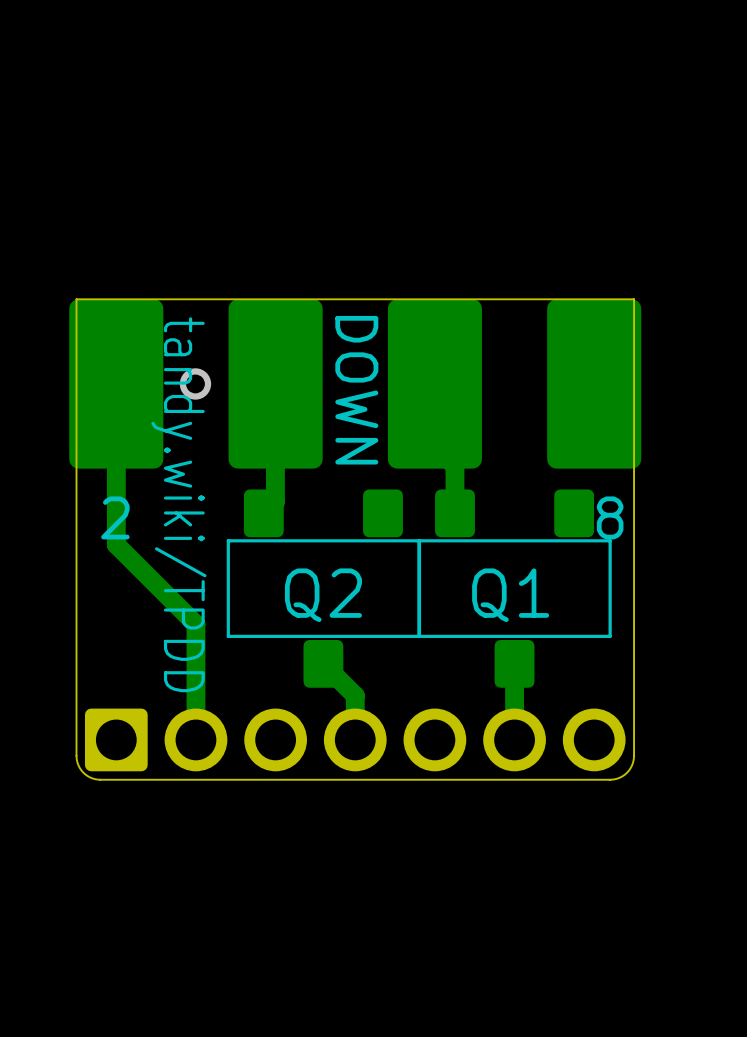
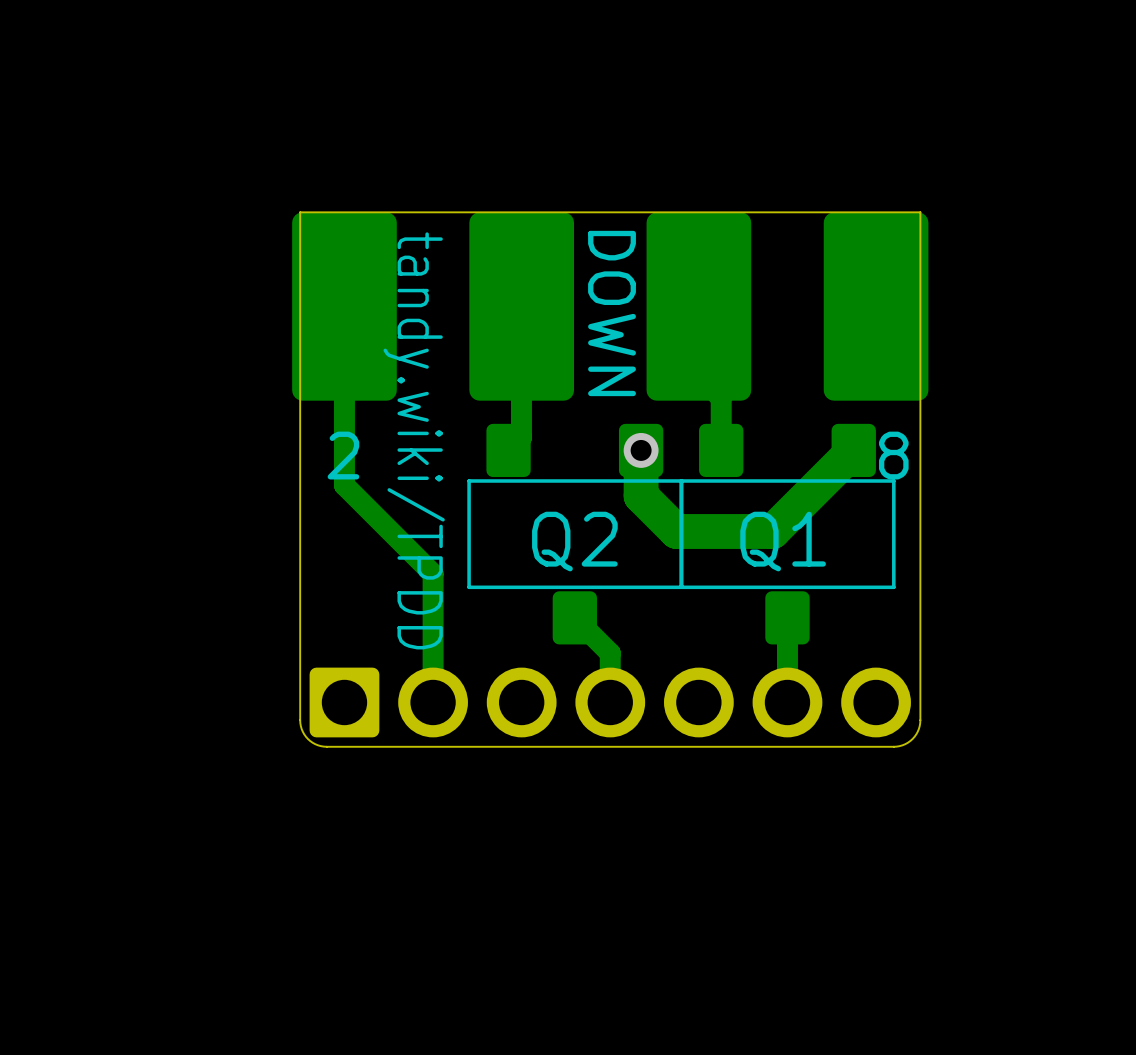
via position: (195, 383) -> (641, 450)
track: none -> (853, 450) (772, 531) (676, 531) (641, 495) (641, 450)

